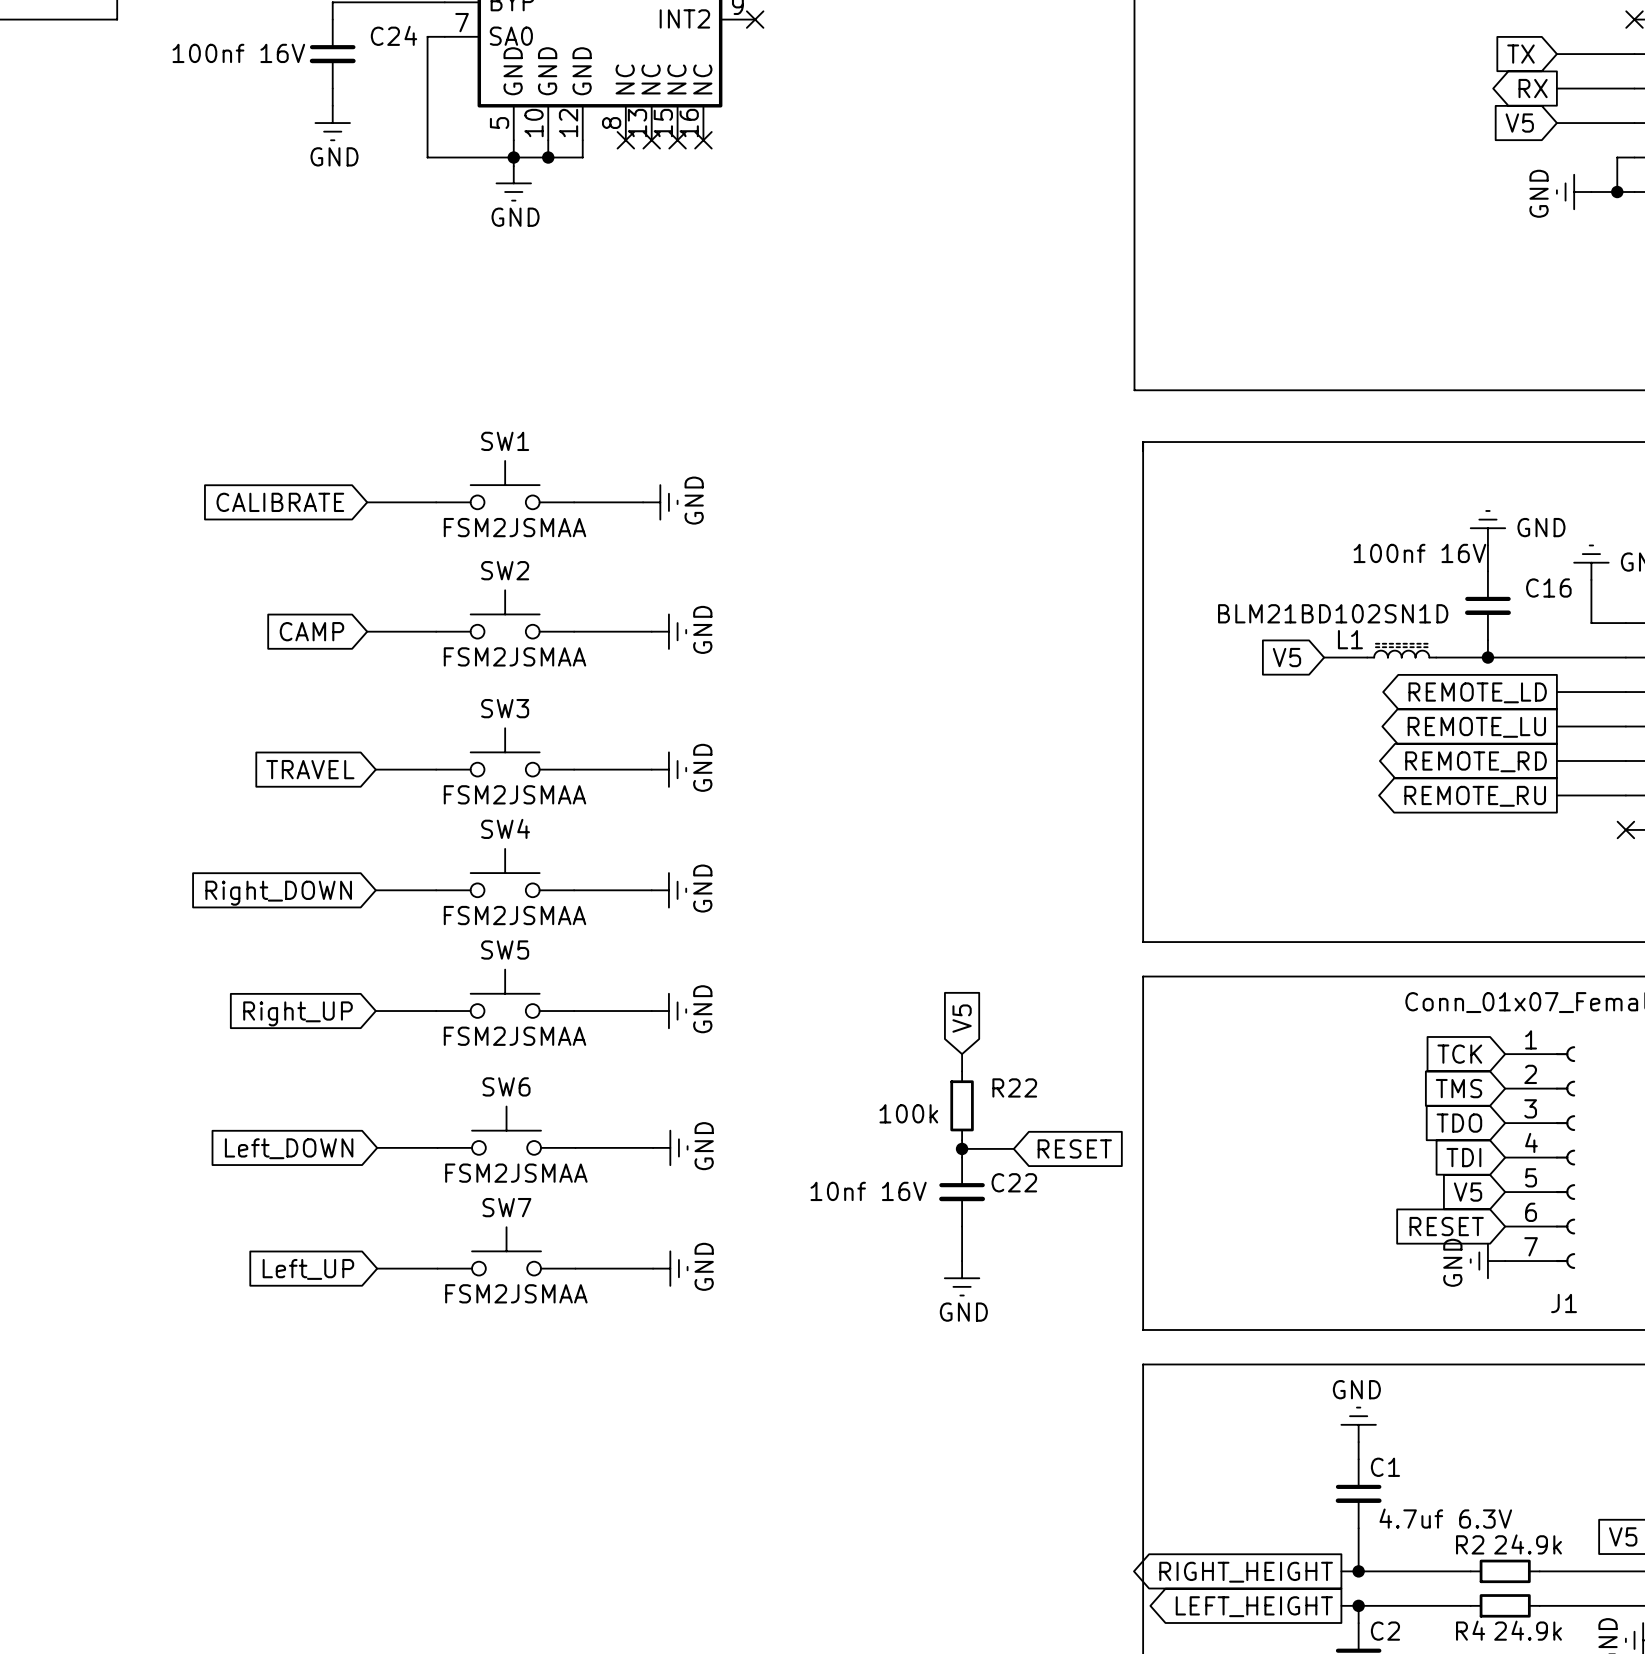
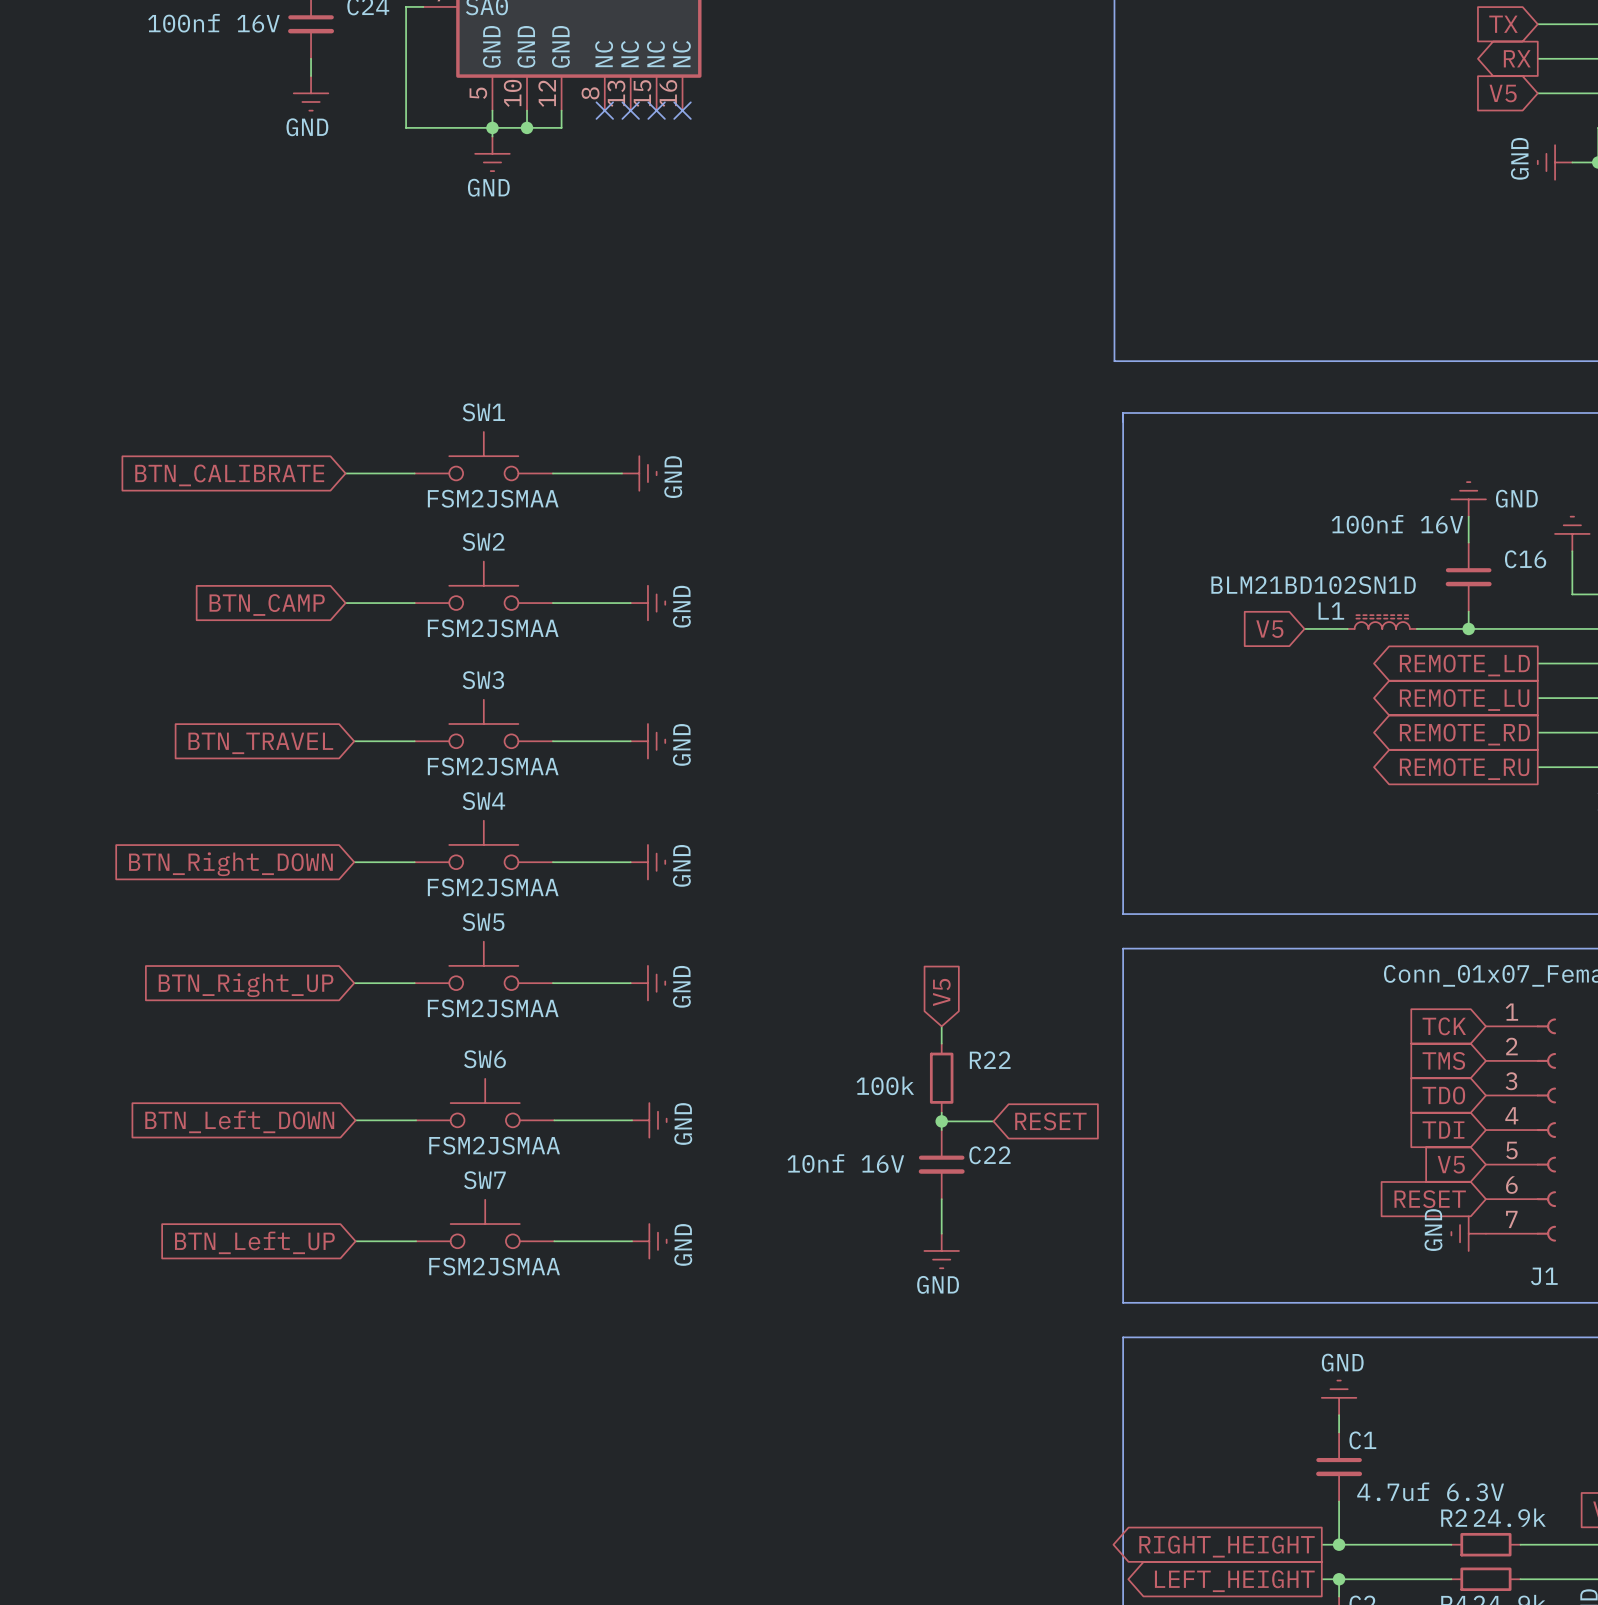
global label: CALIBRATE (280, 502) -> BTN_CALIBRATE (229, 475)
global label: CAMP (311, 631) -> BTN_CAMP (267, 605)
global label: TRAVEL (310, 769) -> BTN_TRAVEL (260, 743)
global label: Right_DOWN (278, 893) -> BTN_Right_DOWN (230, 864)
global label: Right_UP (298, 1013) -> BTN_Right_UP (246, 985)
global label: Left_DOWN (289, 1148) -> BTN_Left_DOWN (239, 1121)
global label: Left_UP (308, 1269) -> BTN_Left_UP (254, 1242)

